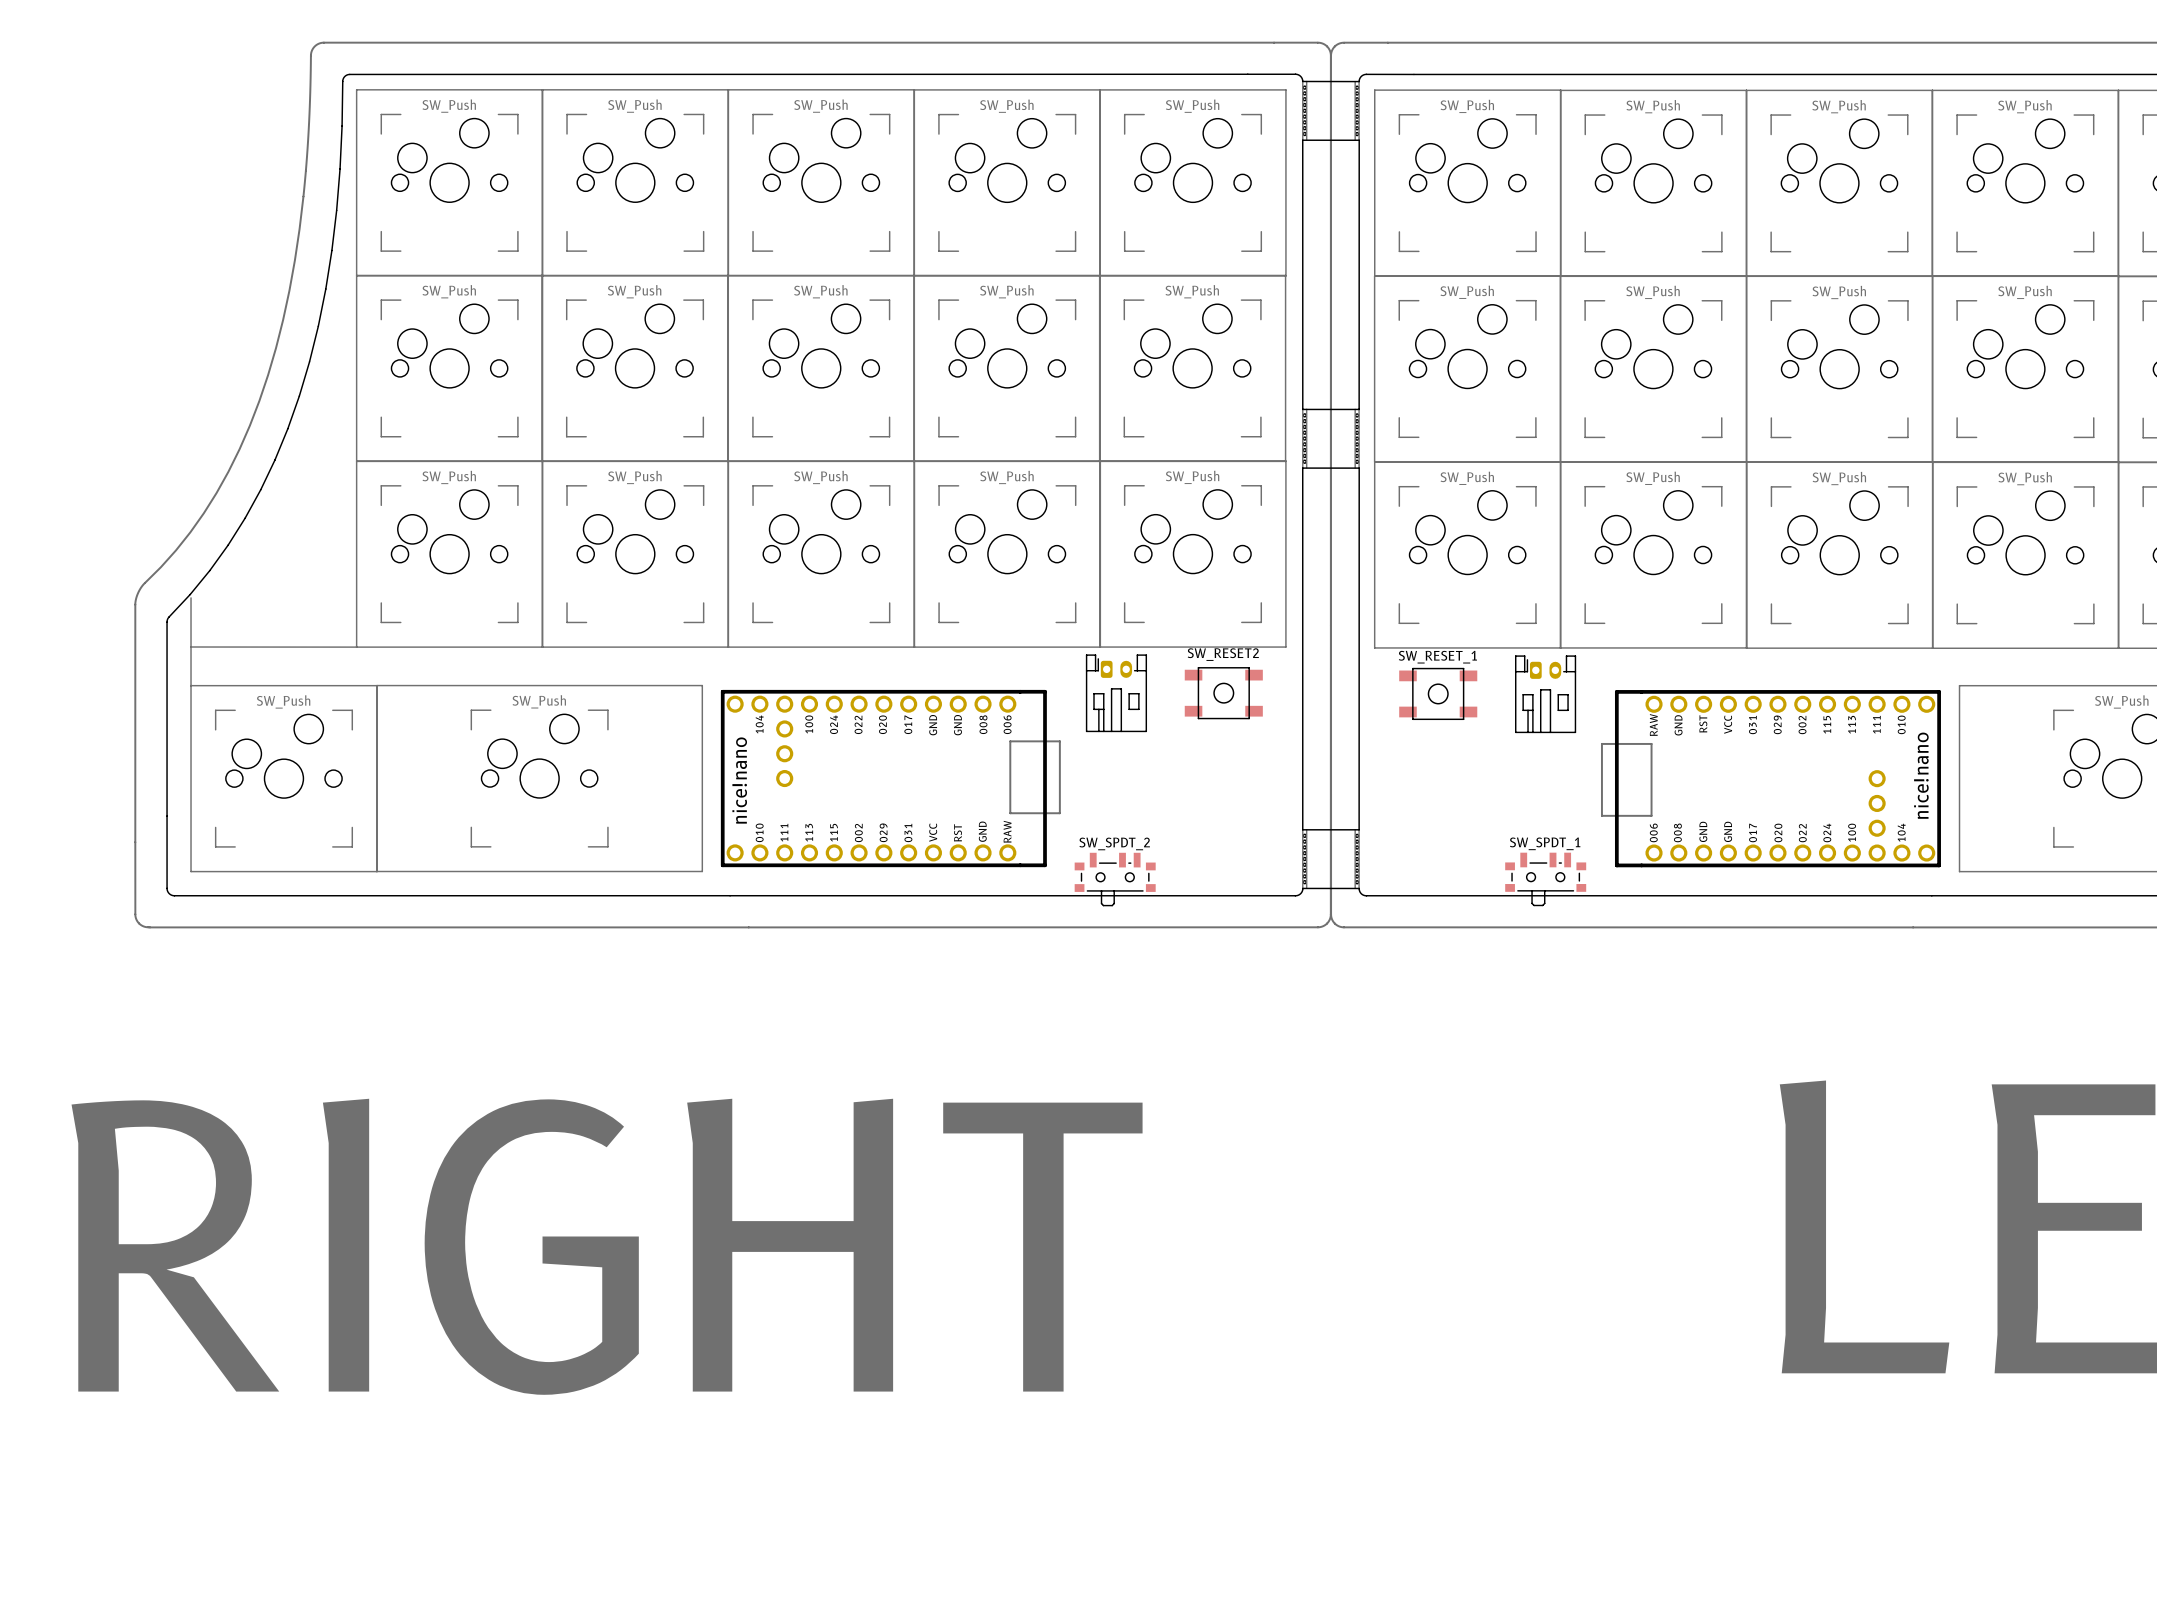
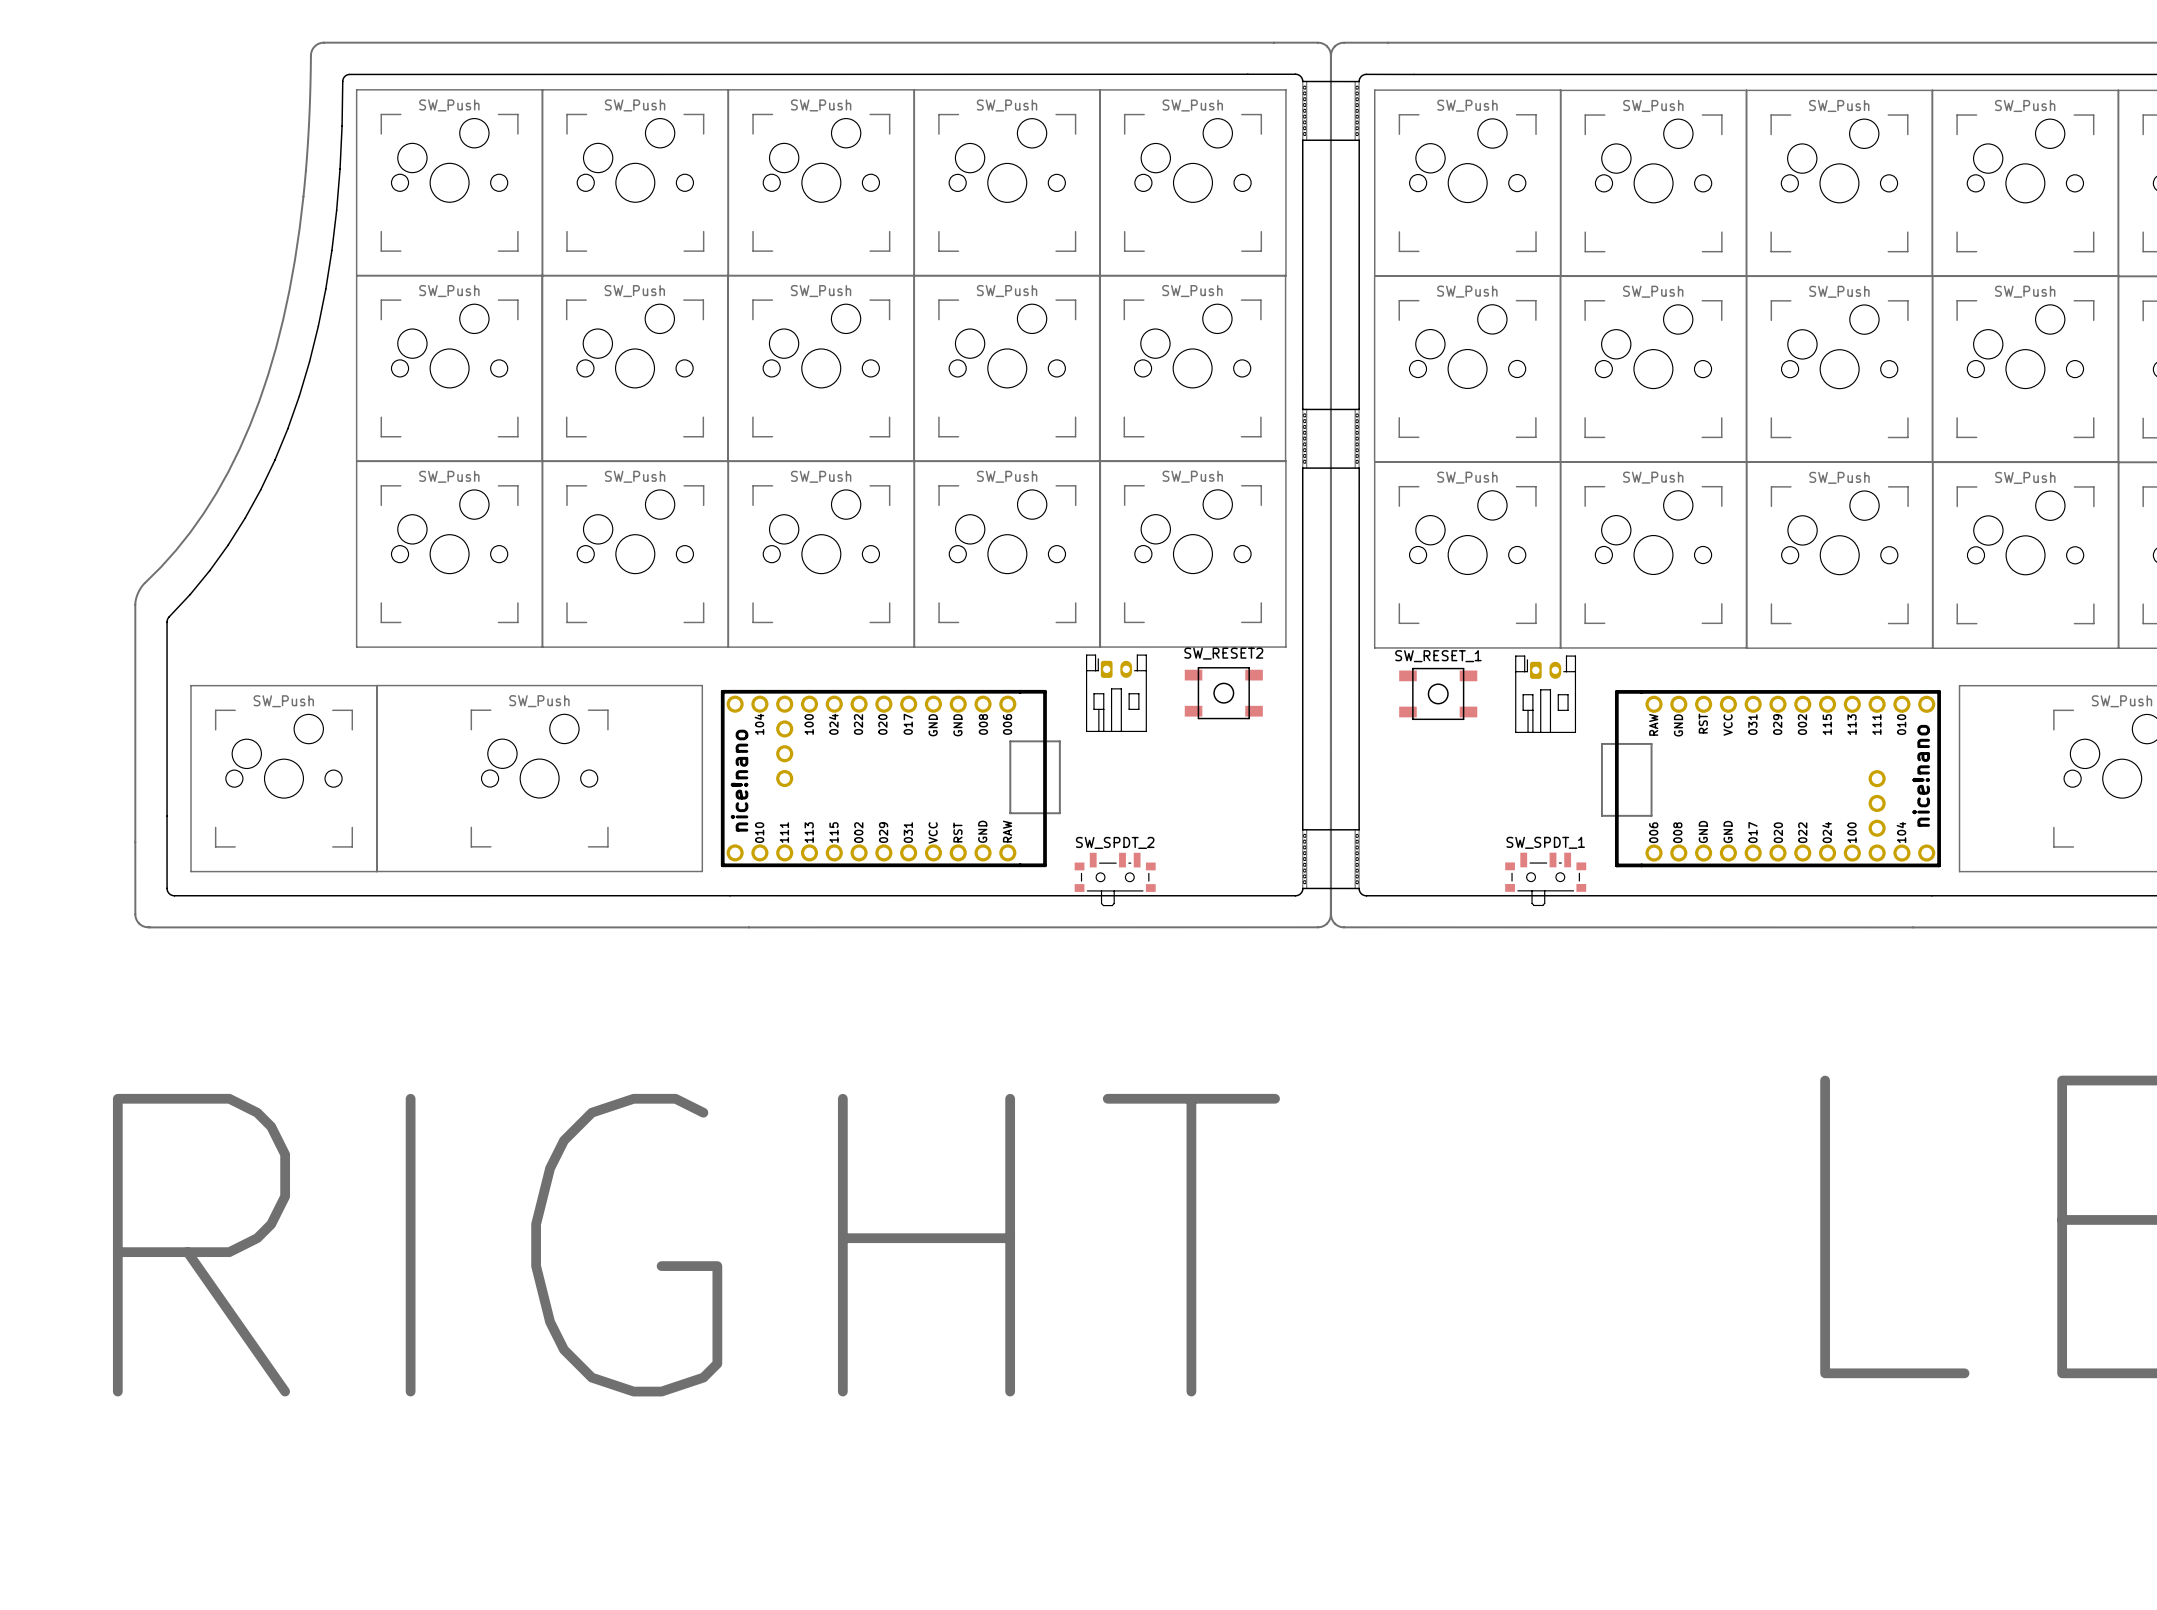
line: (191, 597) (191, 685) -> none
line: (191, 647) (356, 647) -> none

